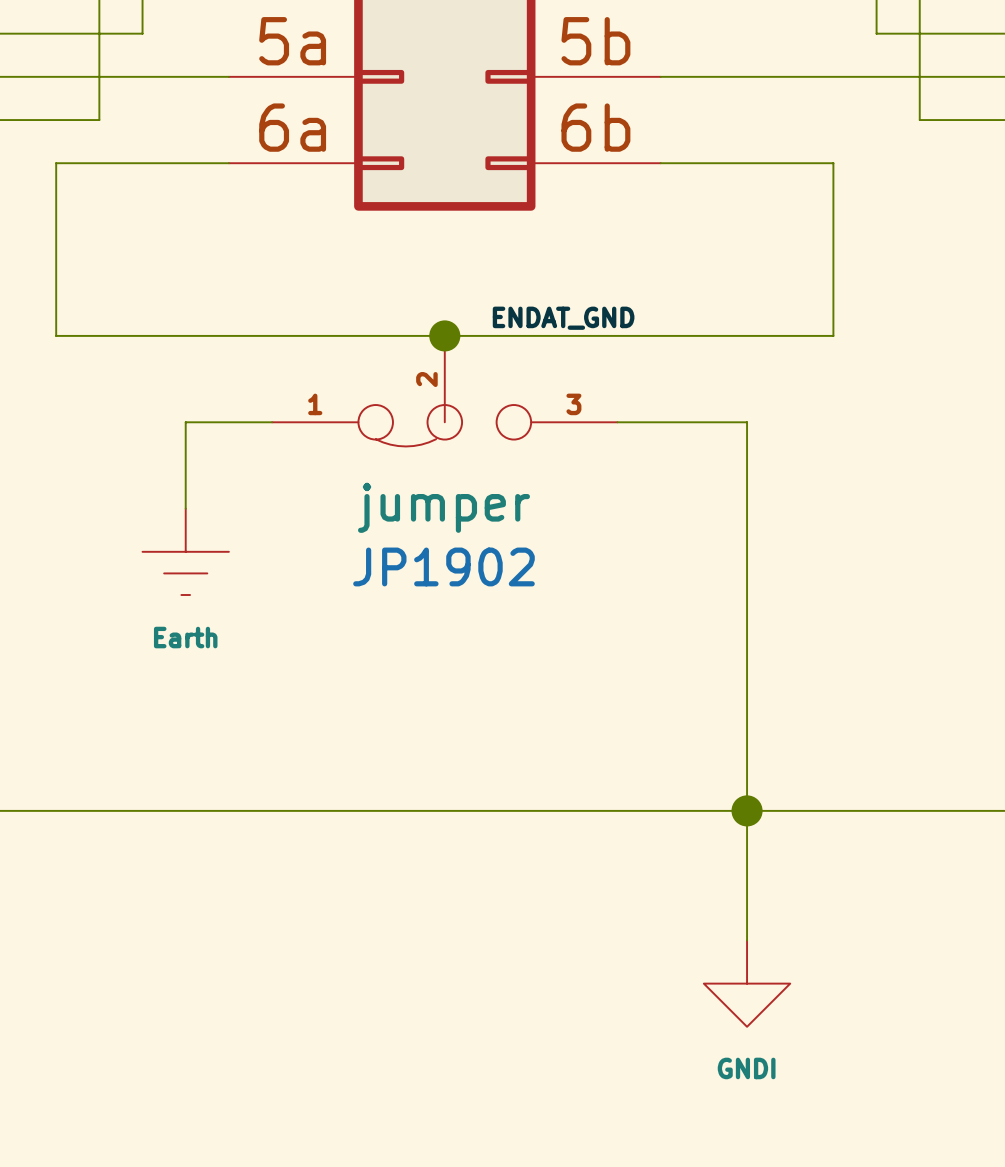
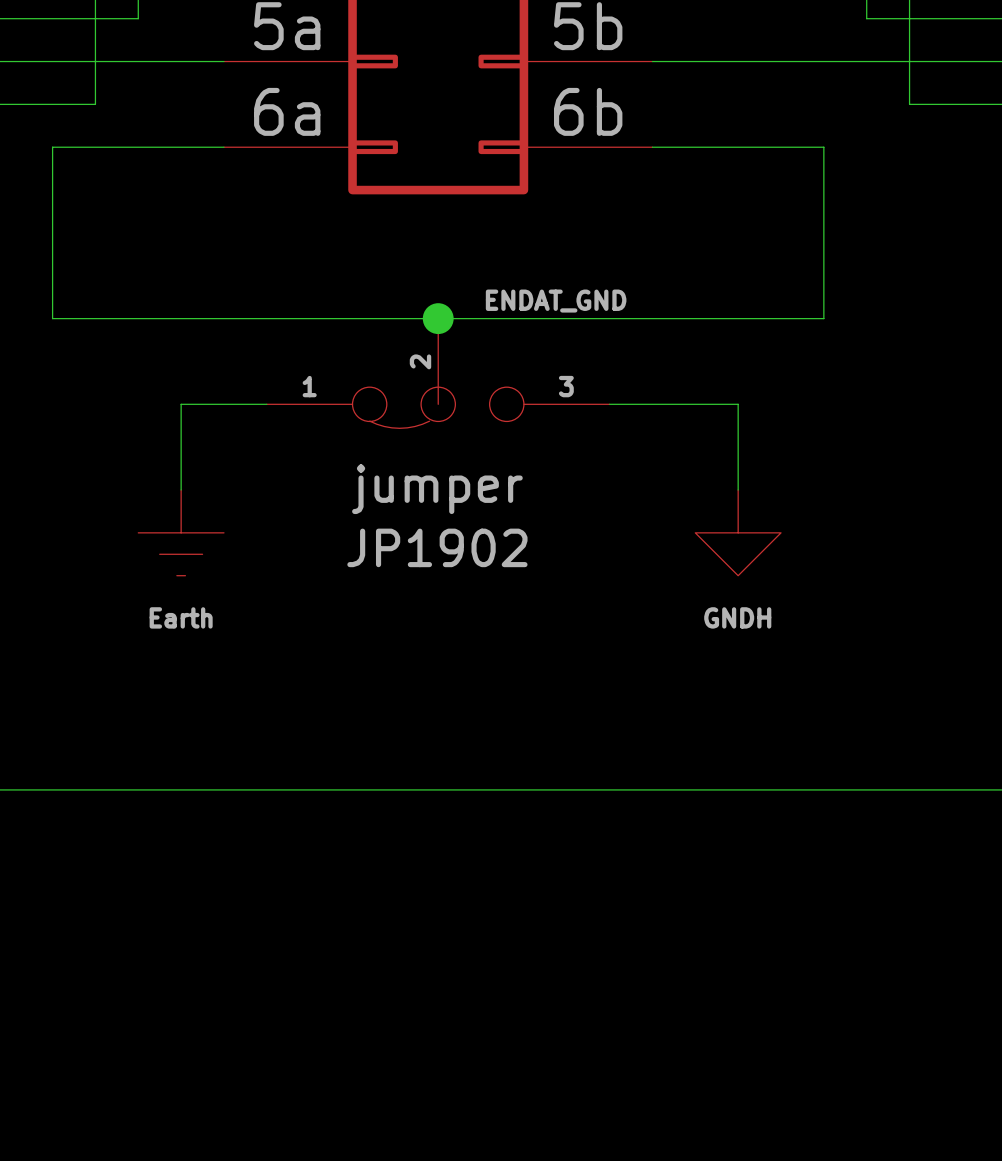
wire: (747, 508) (747, 940) -> none
power symbol: none -> GNDH (738, 532)
junction: (747, 810) -> none
power symbol: GNDI (747, 983) -> none

